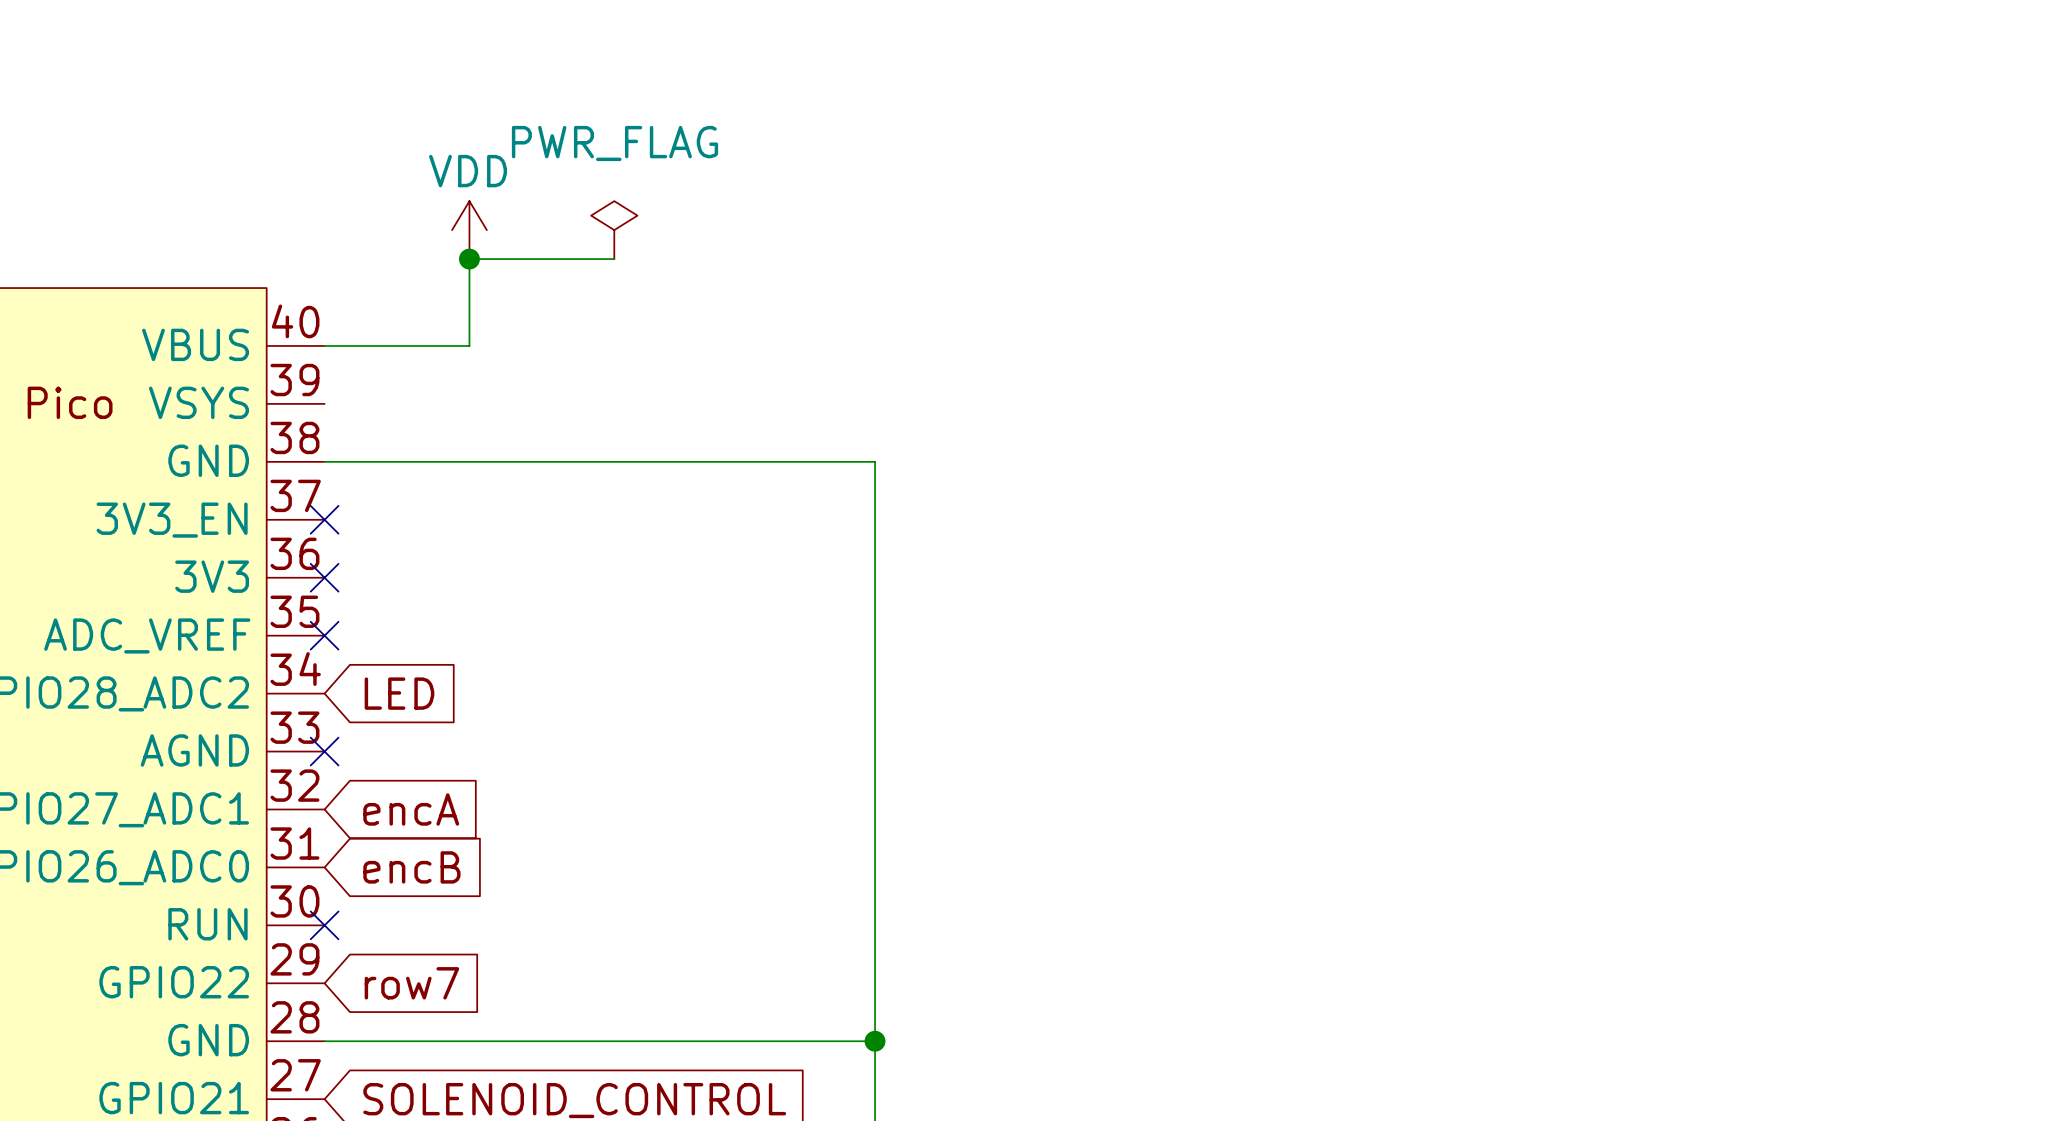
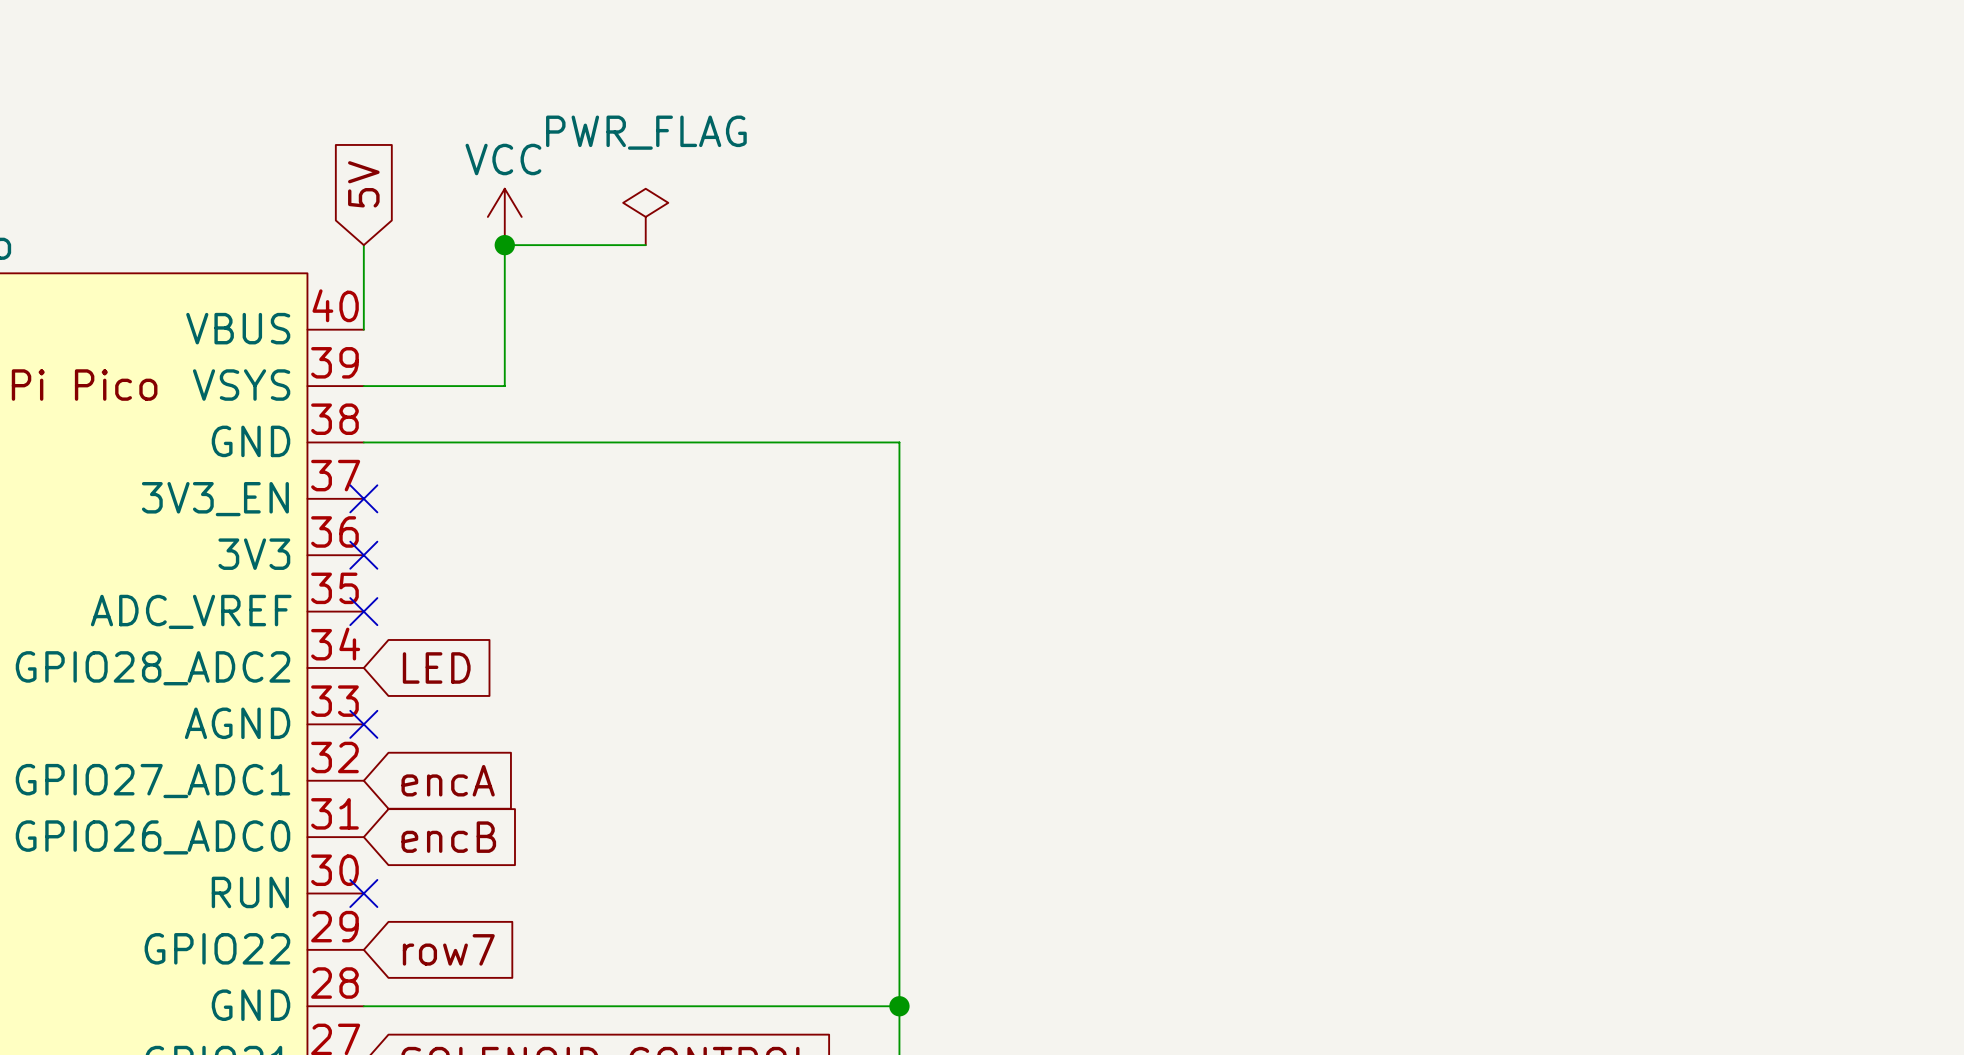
global label: none -> 5V (363, 184)
power symbol: VDD (469, 230) -> VCC (504, 216)
wire: none -> (363, 245) (363, 329)
wire: (324, 345) (469, 345) -> (363, 386) (504, 386) (504, 329)

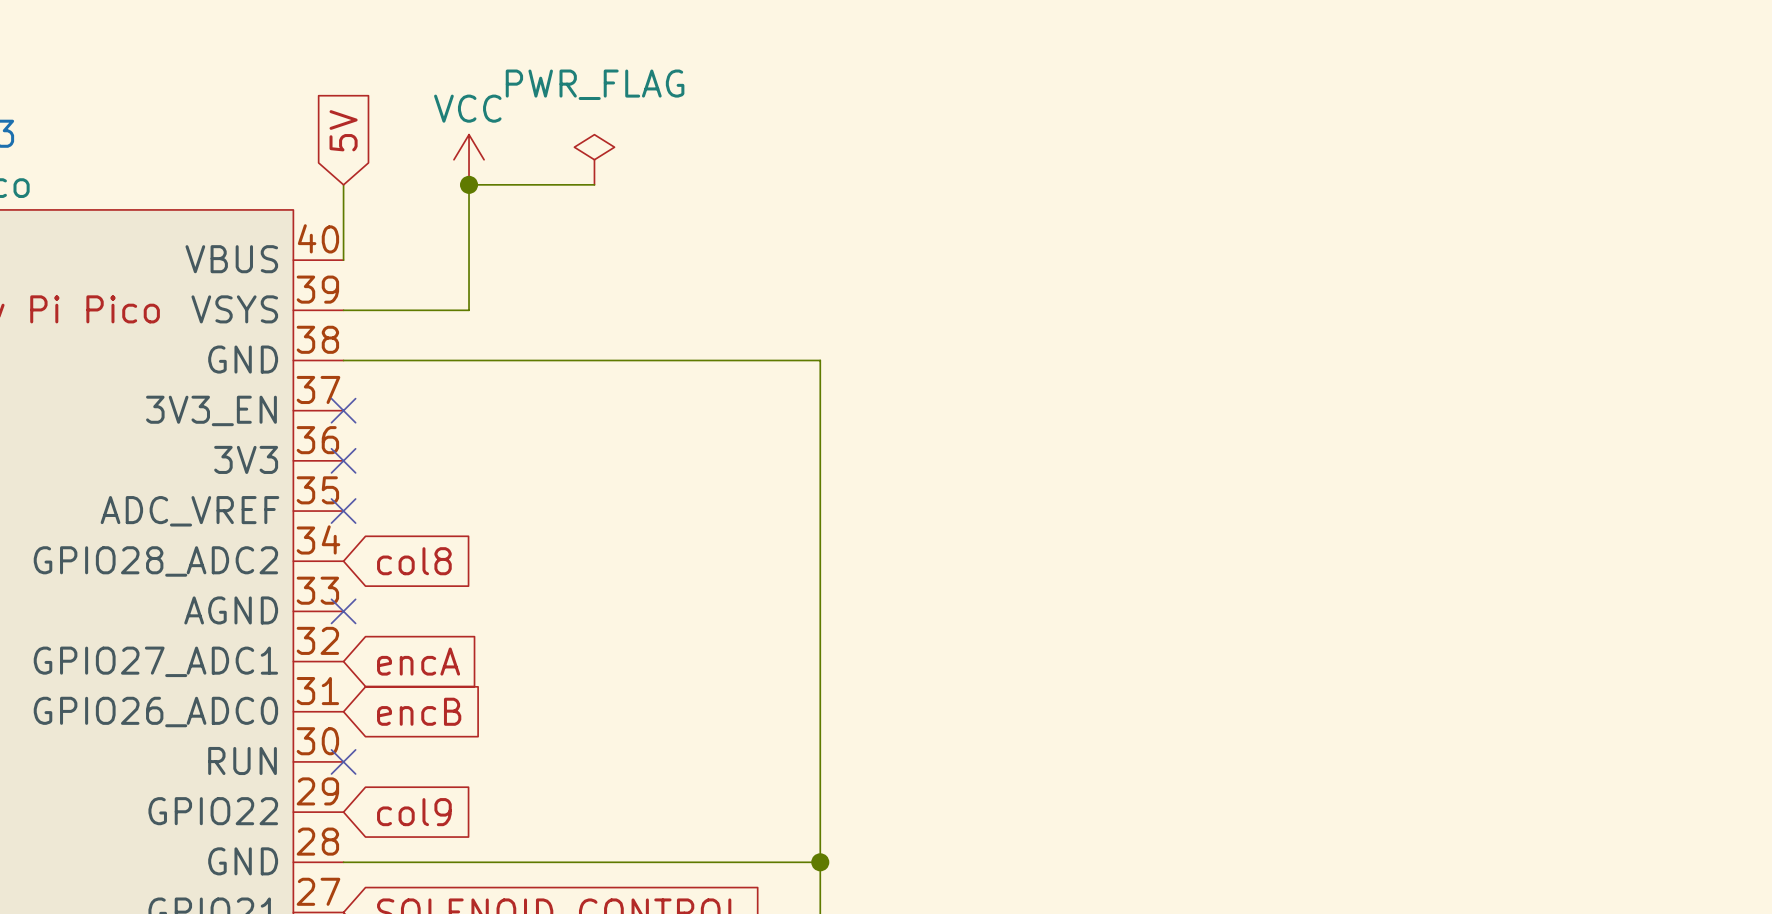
global label: LED (436, 667) -> col8 (414, 561)
global label: row7 (448, 949) -> col9 (414, 812)

